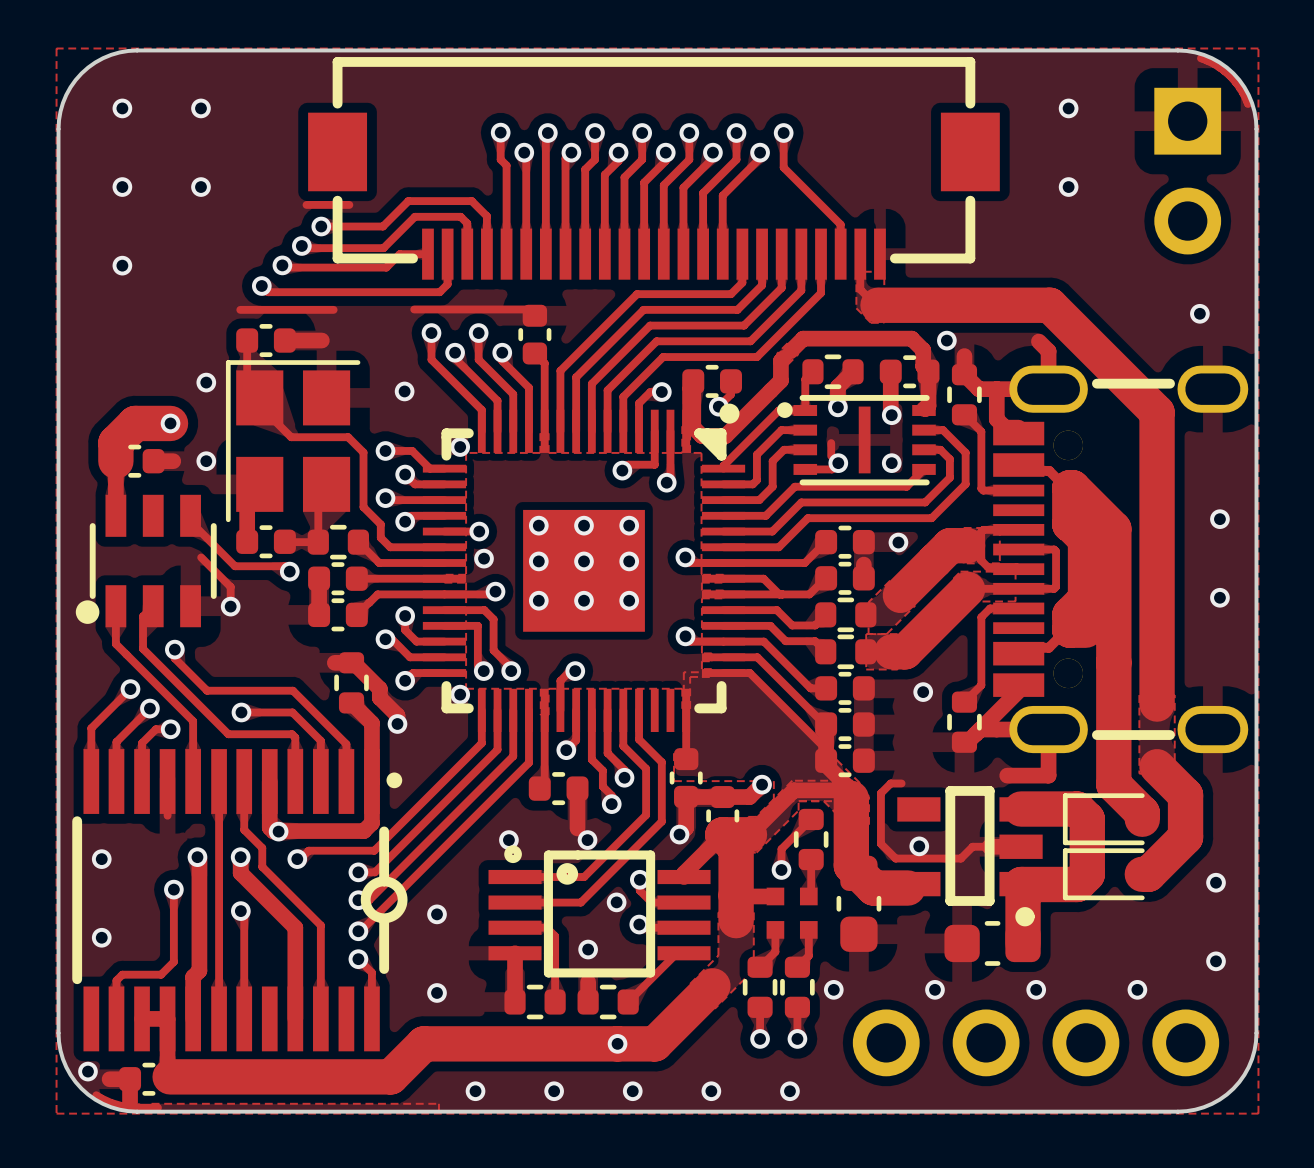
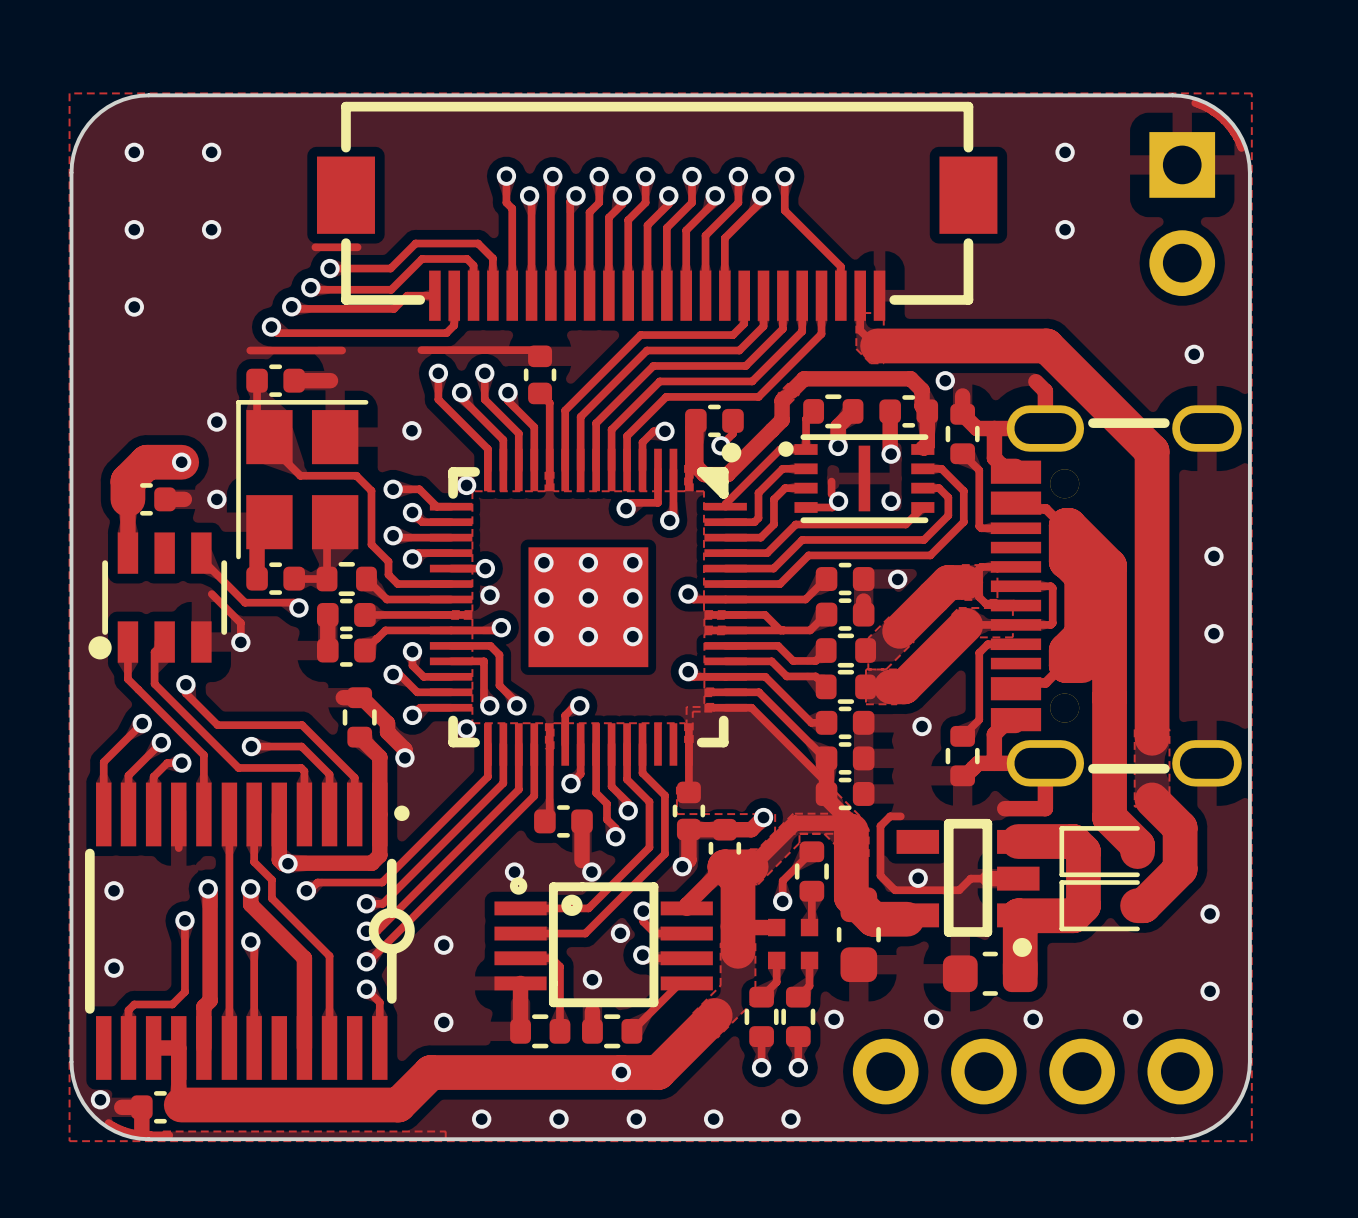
track: (1018, 691) (980, 729) -> (1015, 725) (1003, 725) (994, 734) (994, 763)

